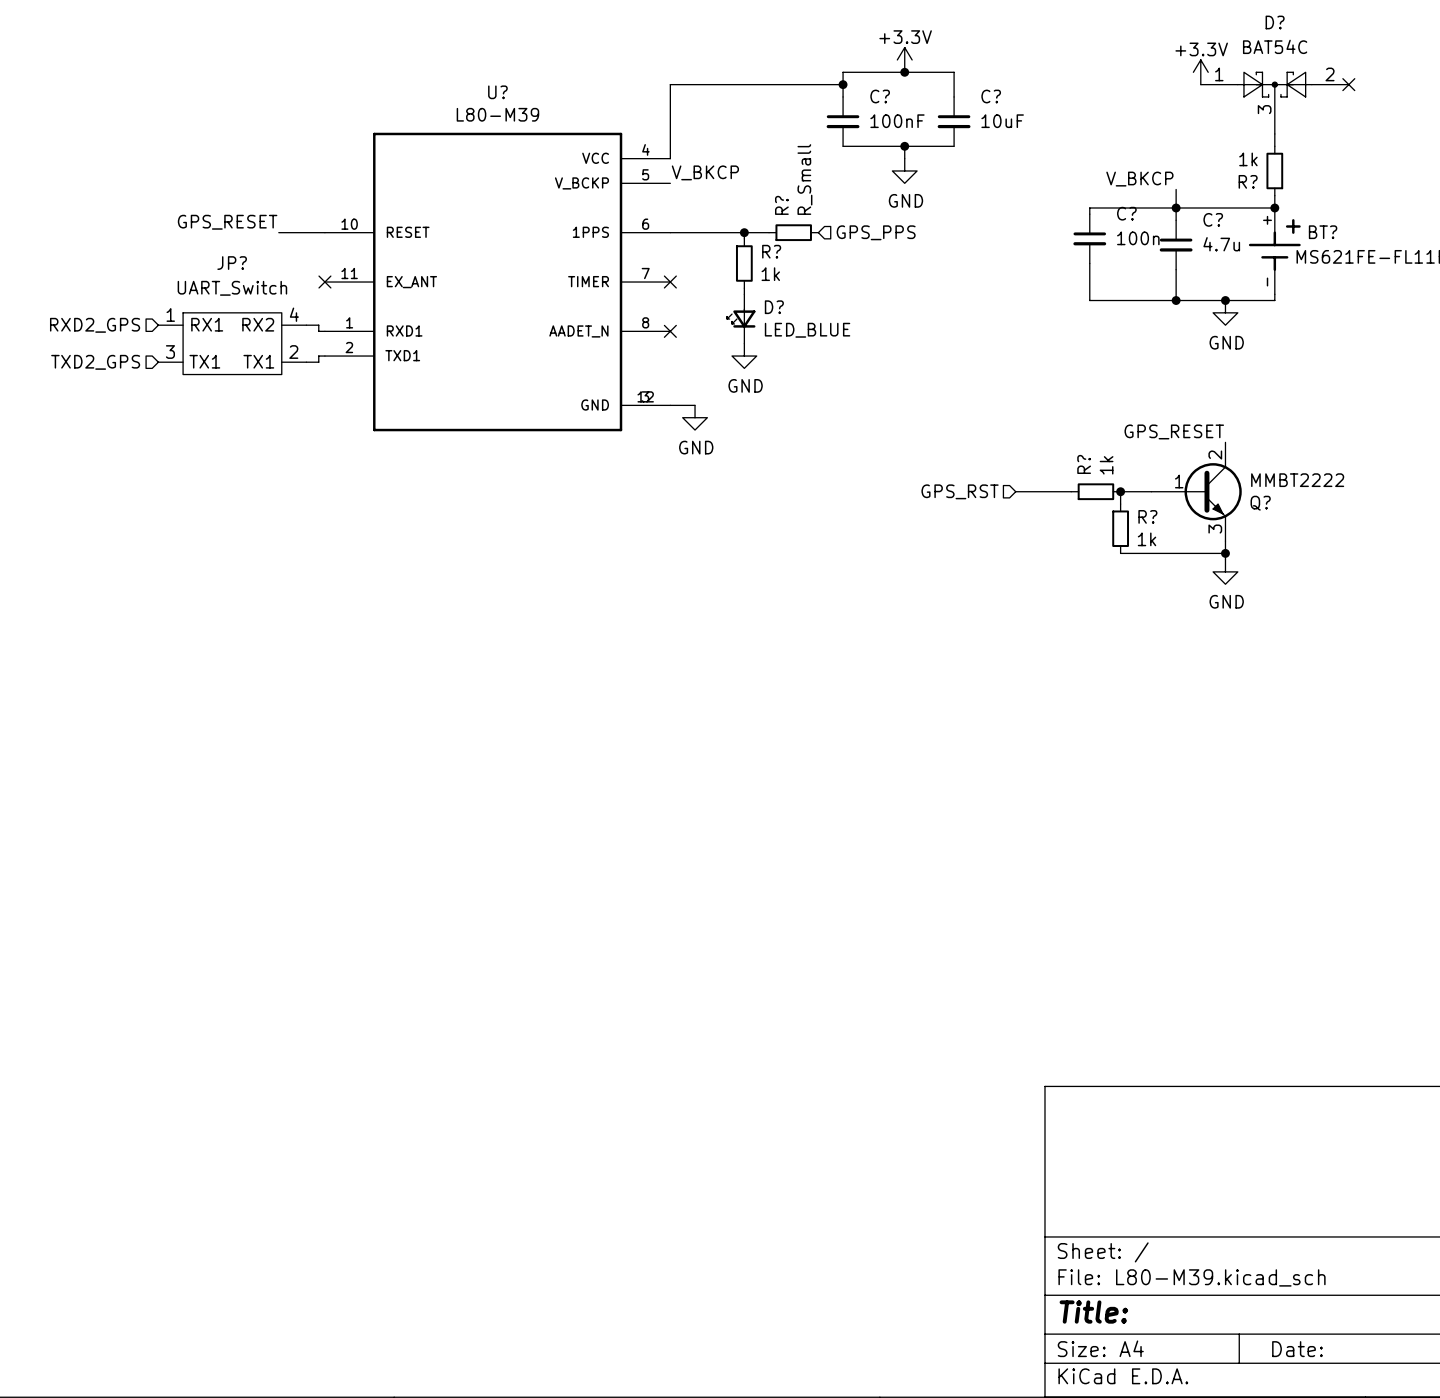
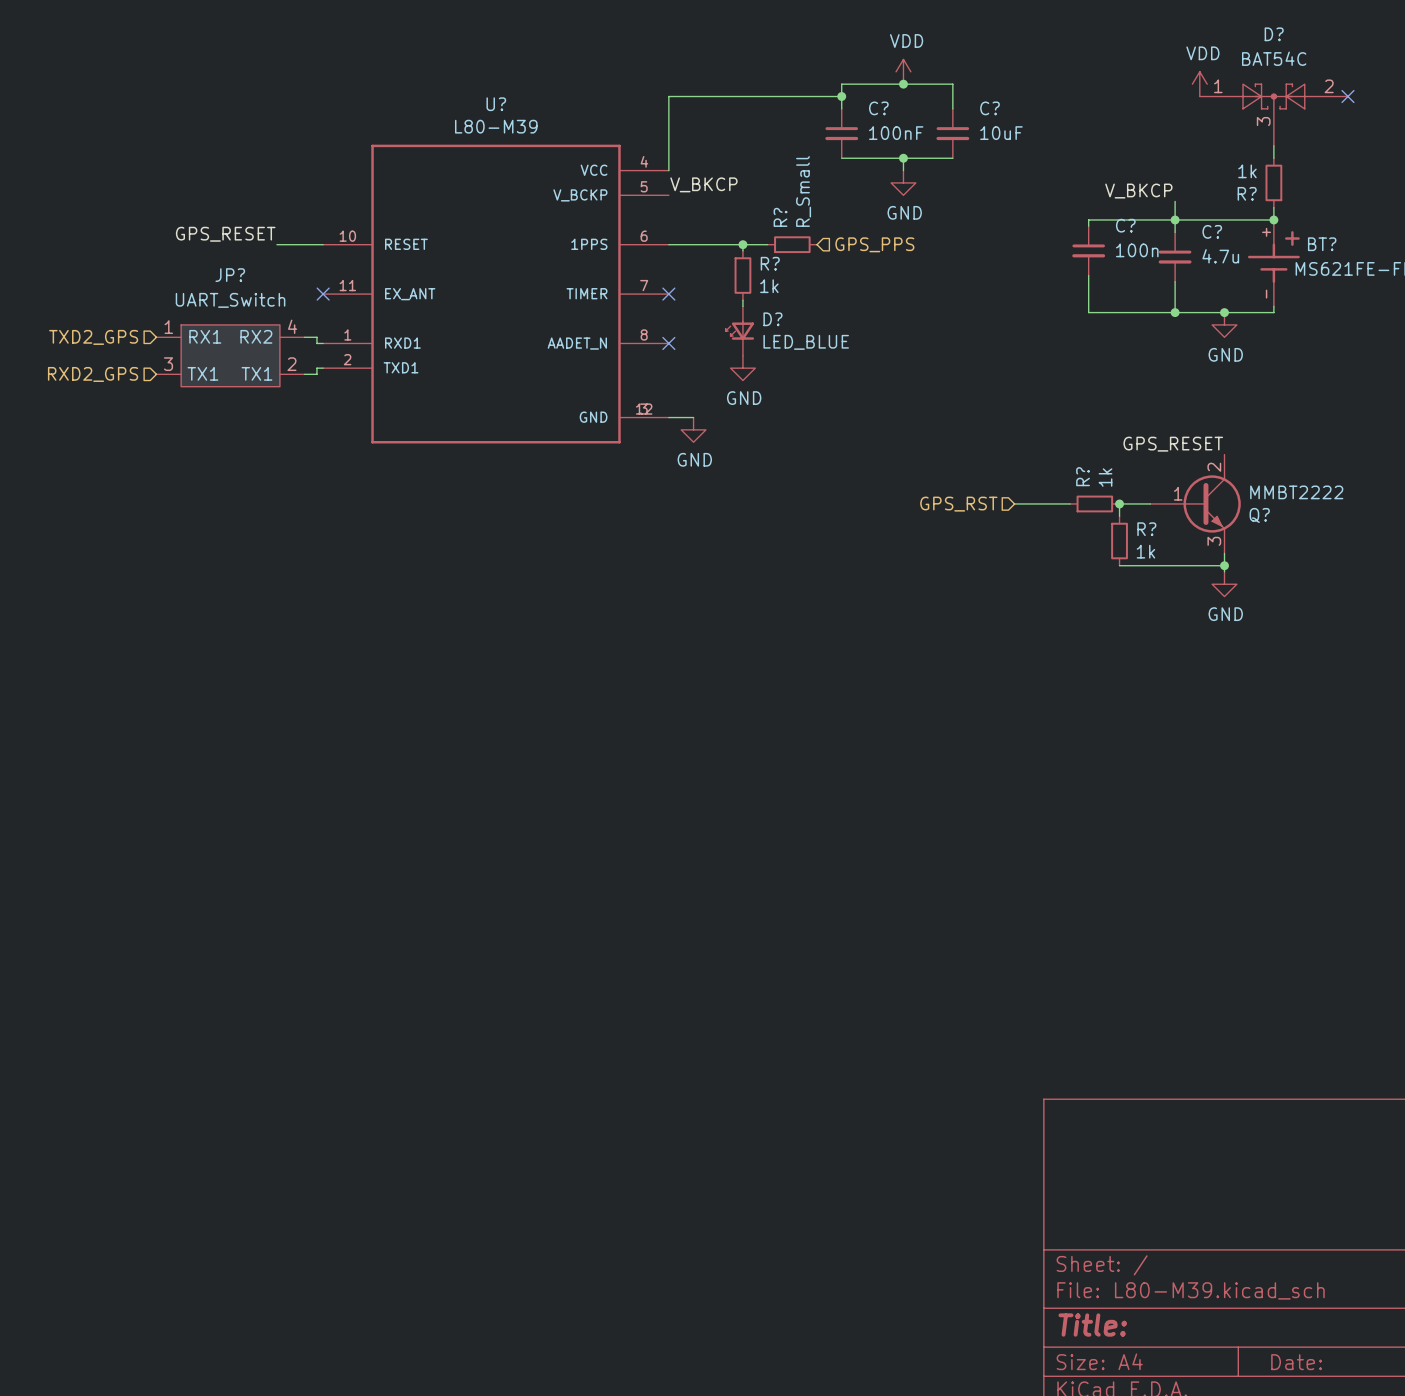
power symbol: +3.3V (904, 59) -> VDD (903, 71)
power symbol: +3.3V (1200, 72) -> VDD (1199, 84)
hierarchical label: RXD2_GPS (95, 325) -> TXD2_GPS (93, 337)
hierarchical label: TXD2_GPS (95, 362) -> RXD2_GPS (93, 374)

